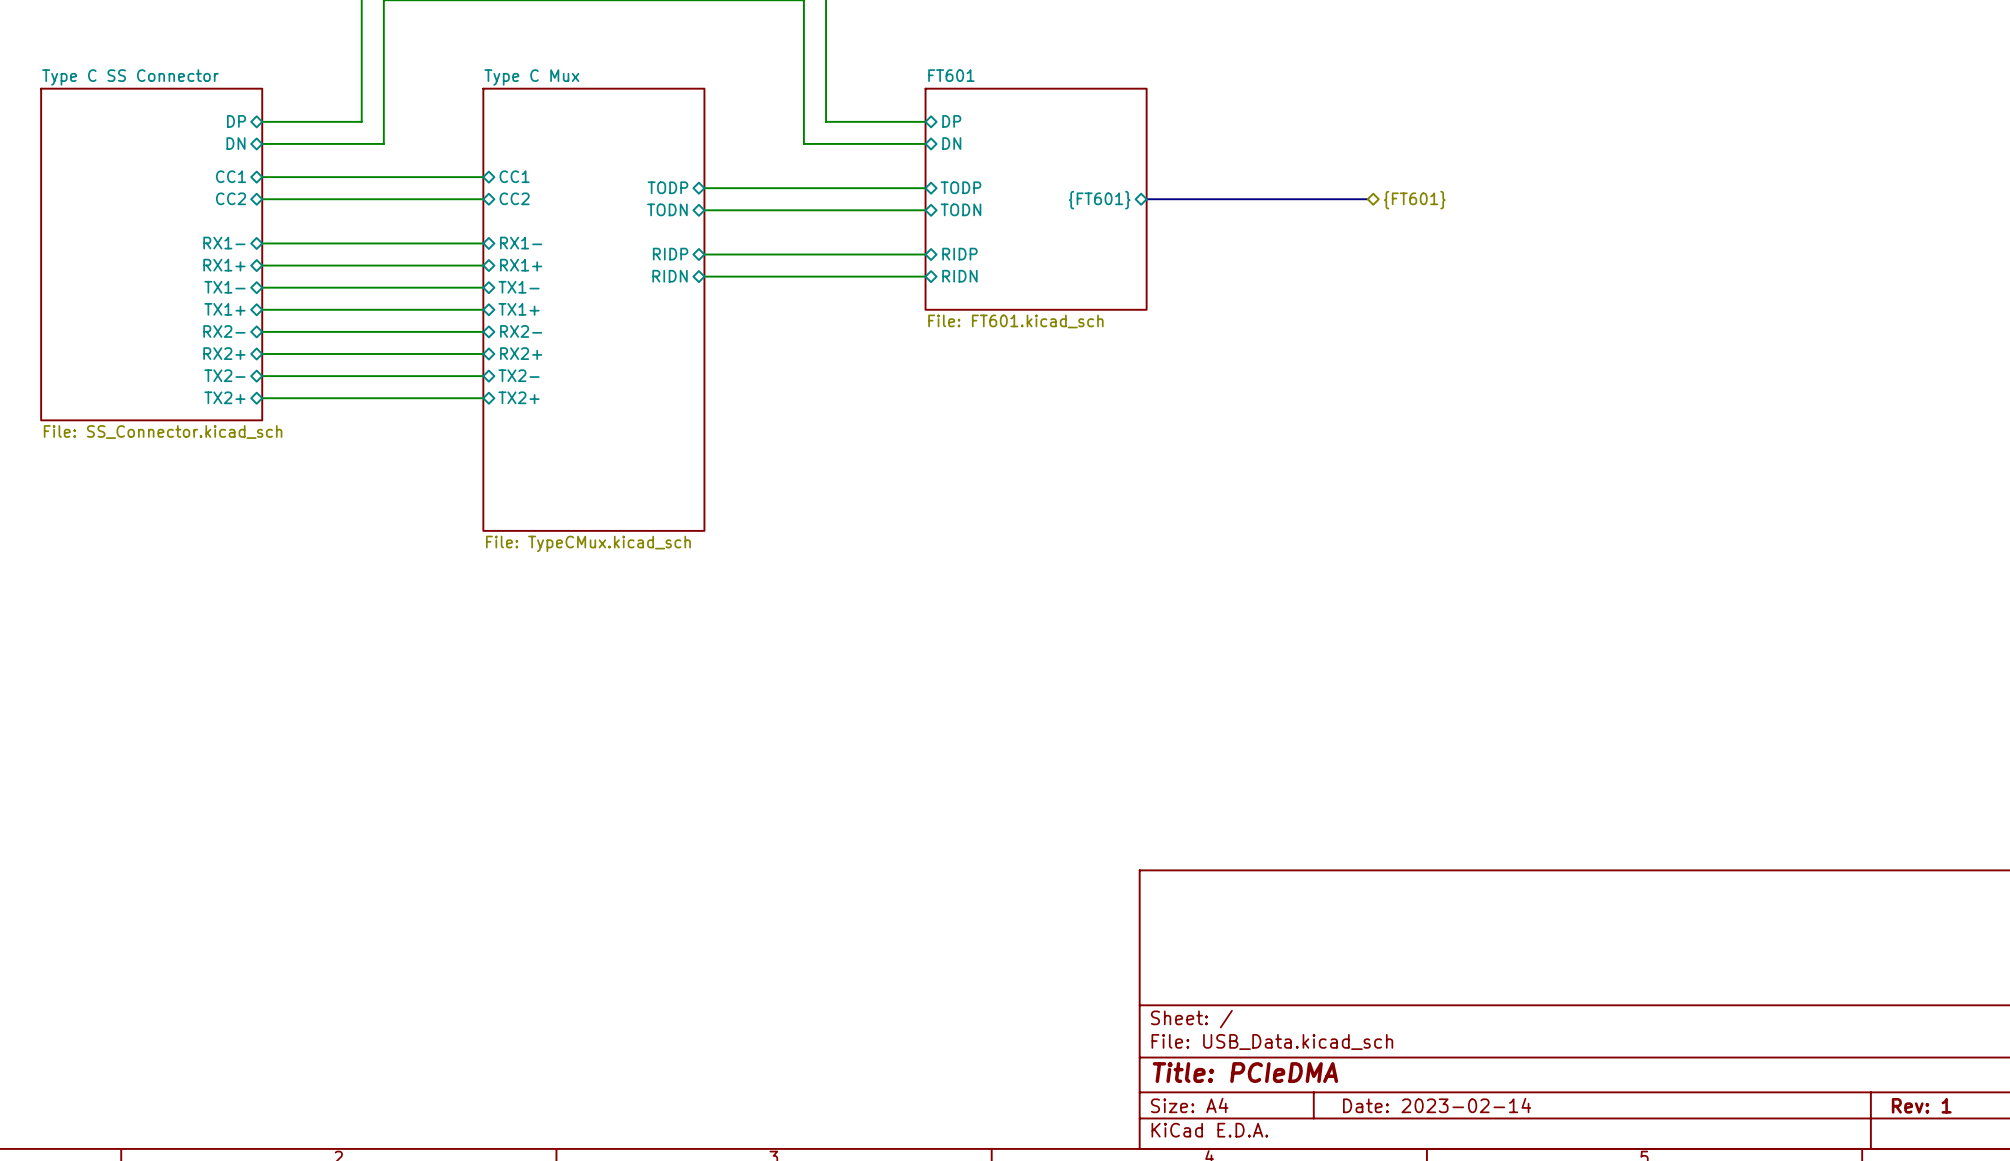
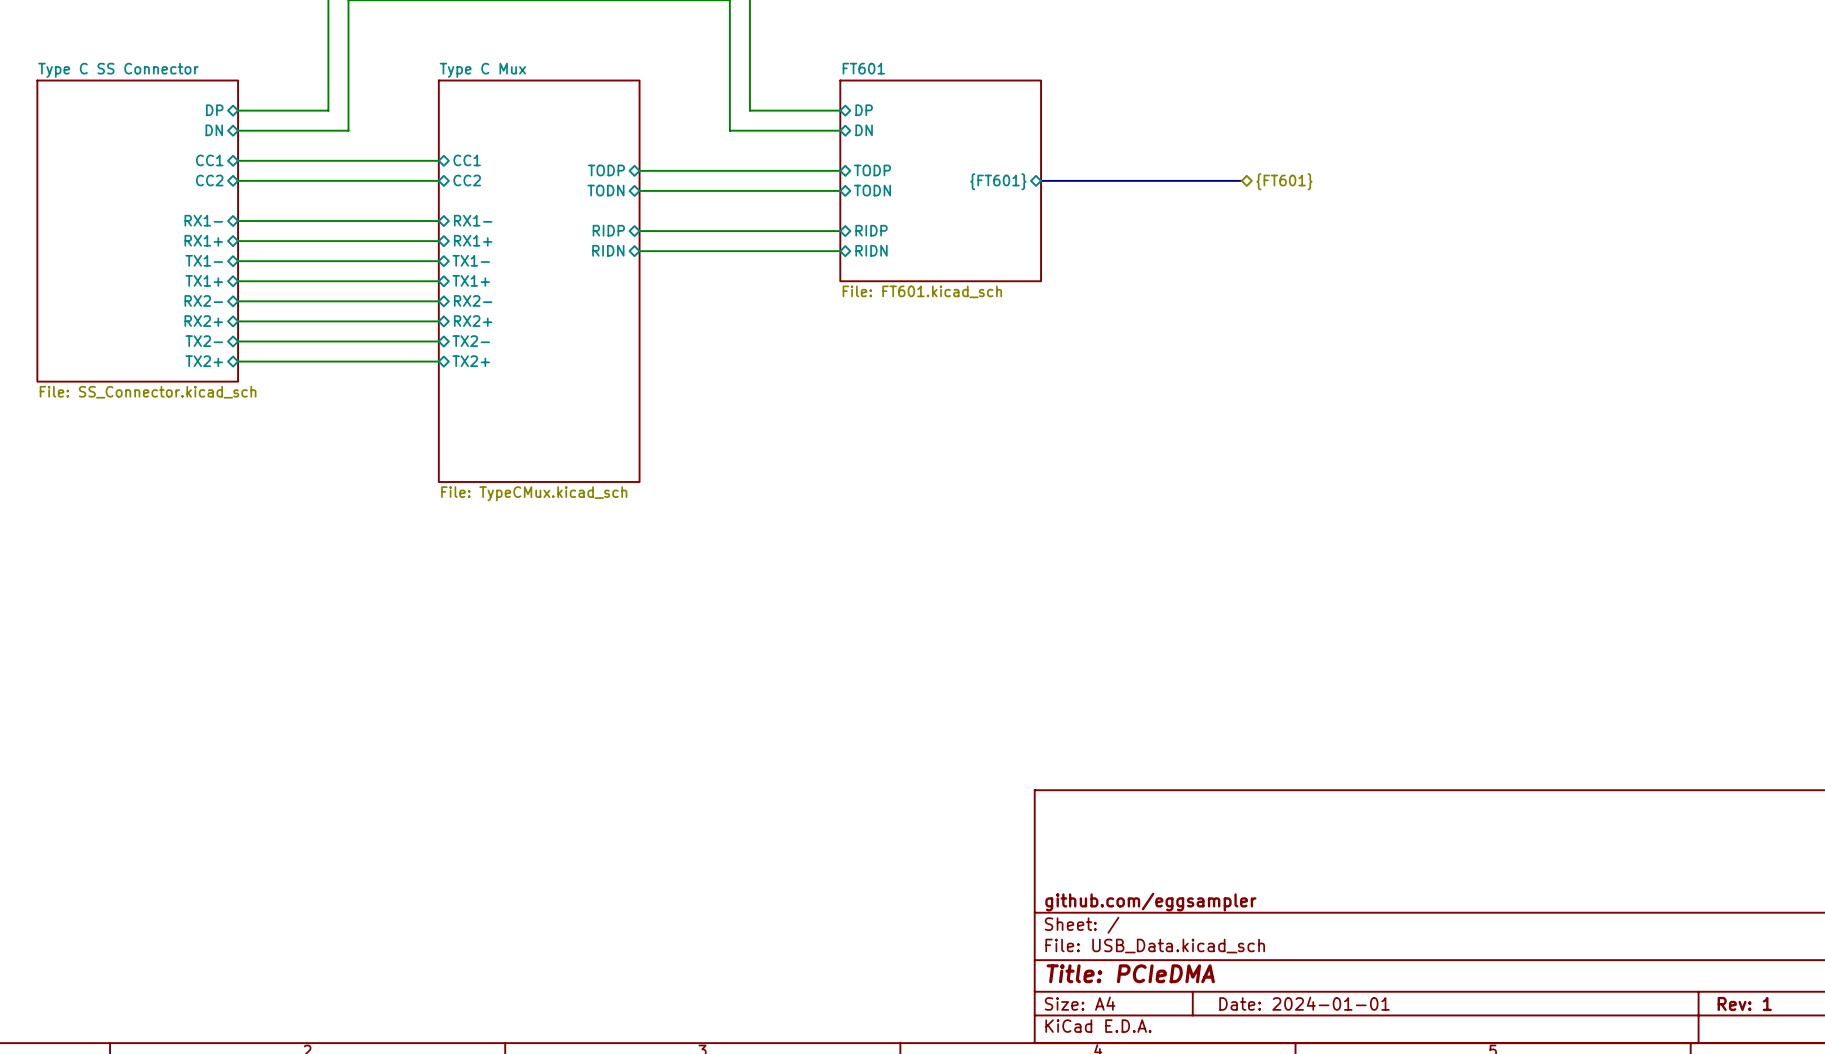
title block: none -> github.com/eggsampler (1150, 902)
title block: Date: 2023-02-14 (1437, 1105) -> Date: 2024-01-01 (1304, 1003)

